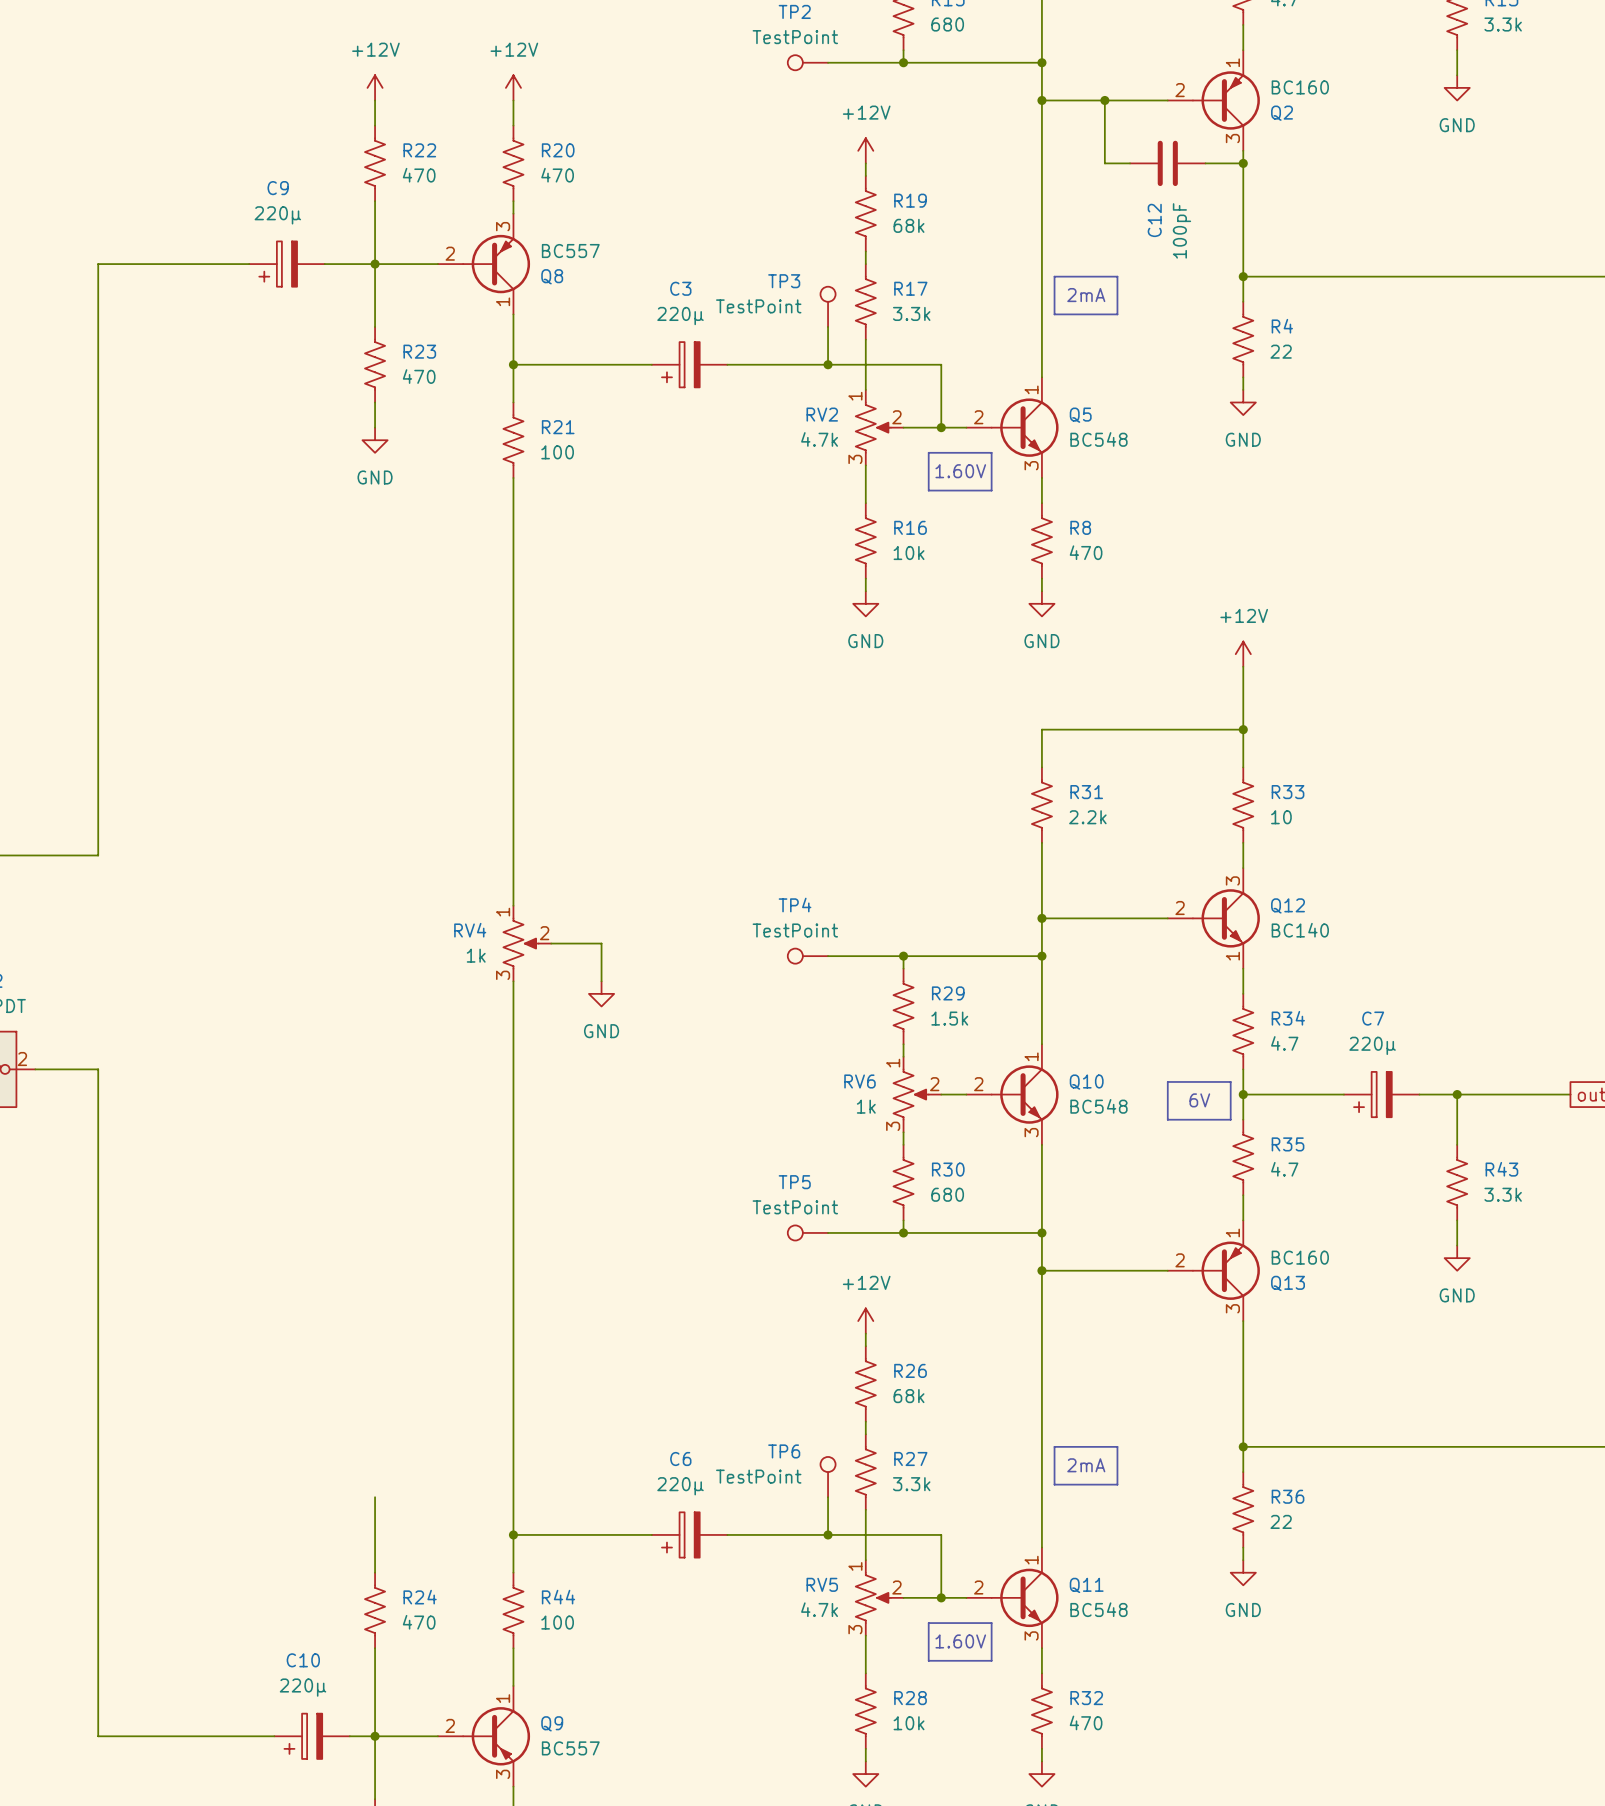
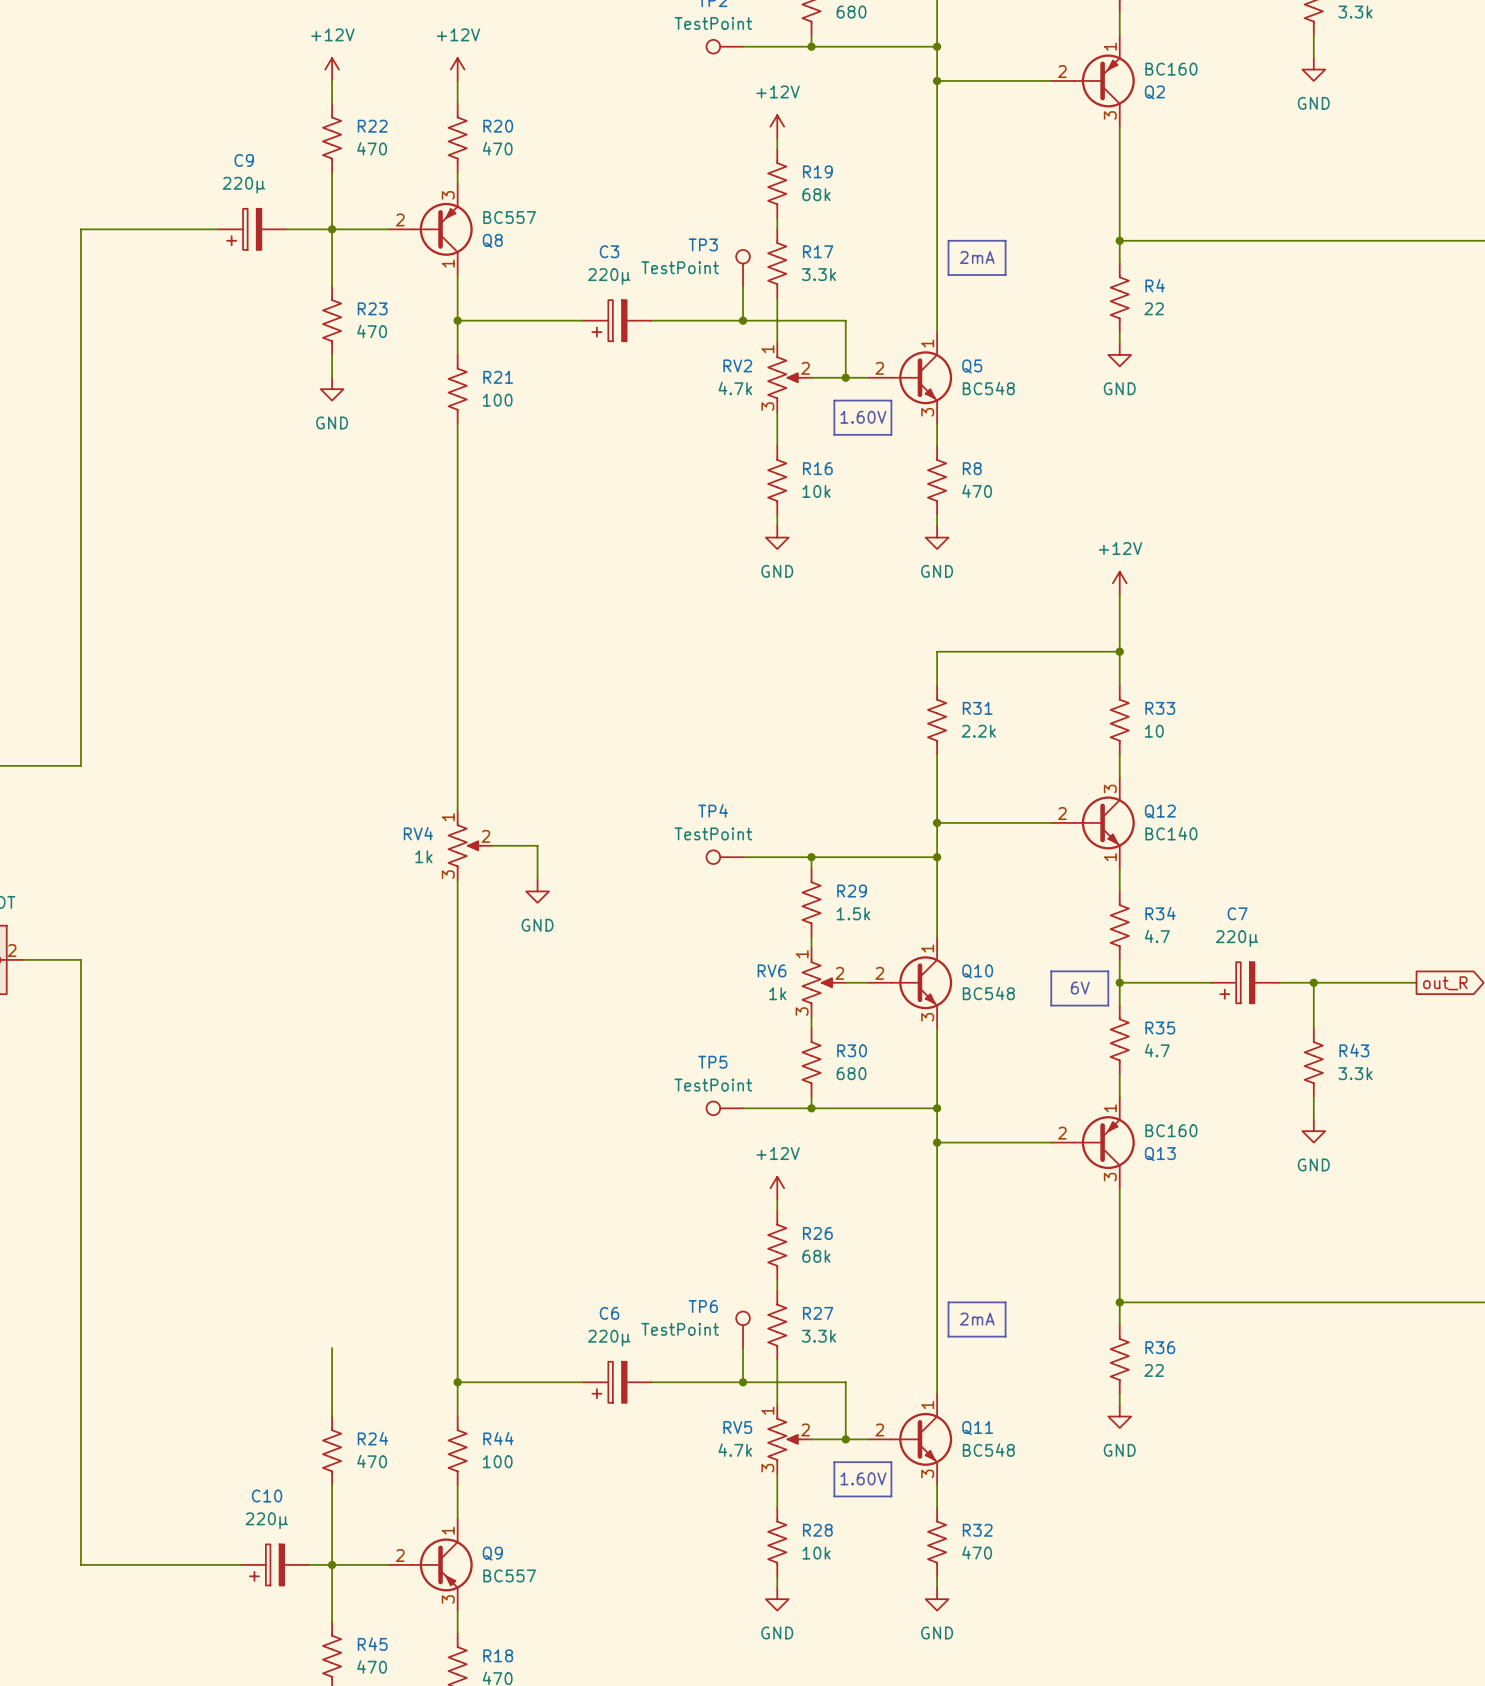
wire: (1104, 100) (1104, 163) (1130, 163) -> none
junction: (1104, 100) -> none
C12: 100pF (1167, 163) -> none
wire: (1205, 163) (1243, 163) -> none
junction: (1243, 163) -> none

